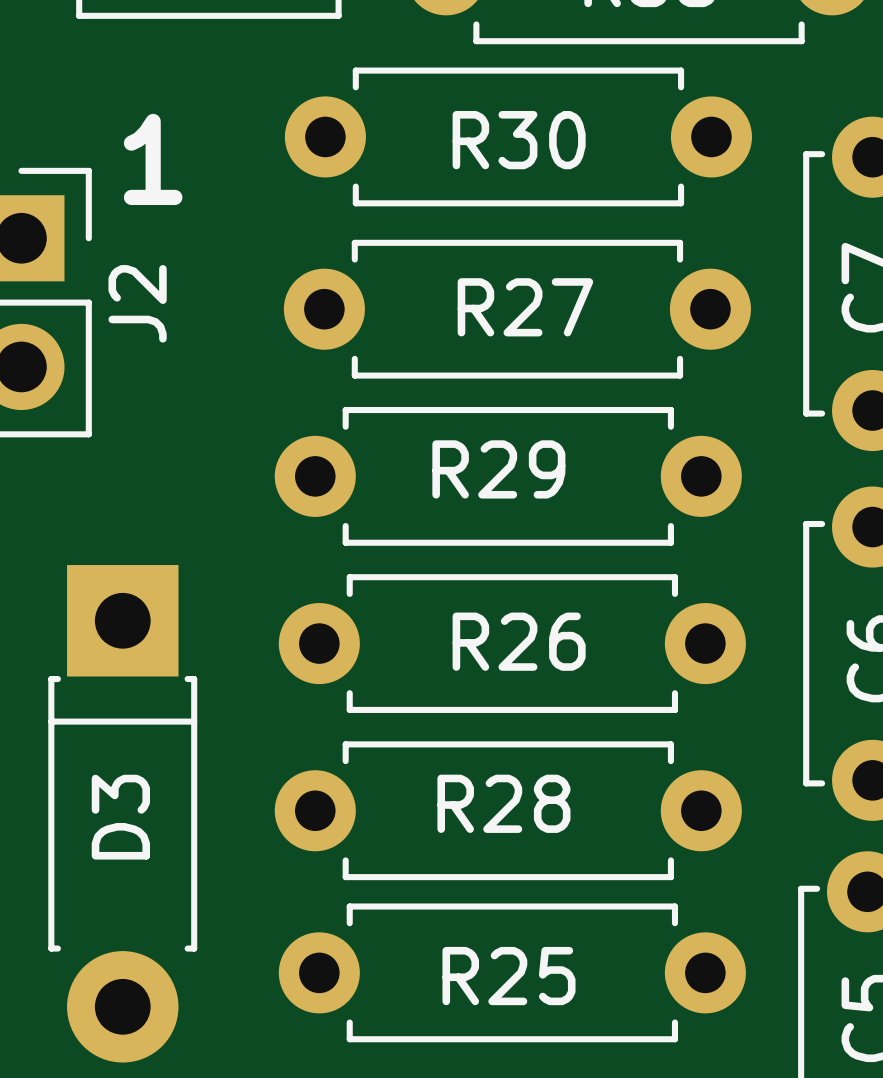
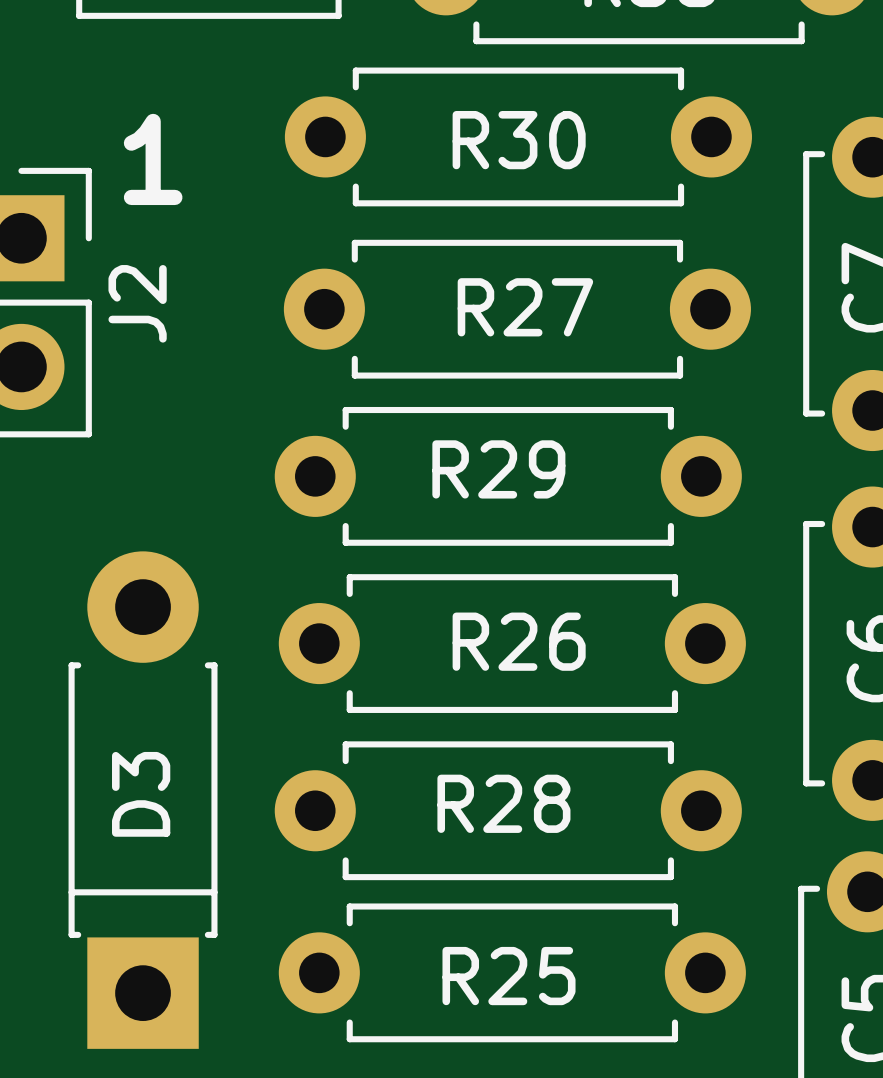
D3 rotation: 0° (122, 813) -> 180° (143, 800)

